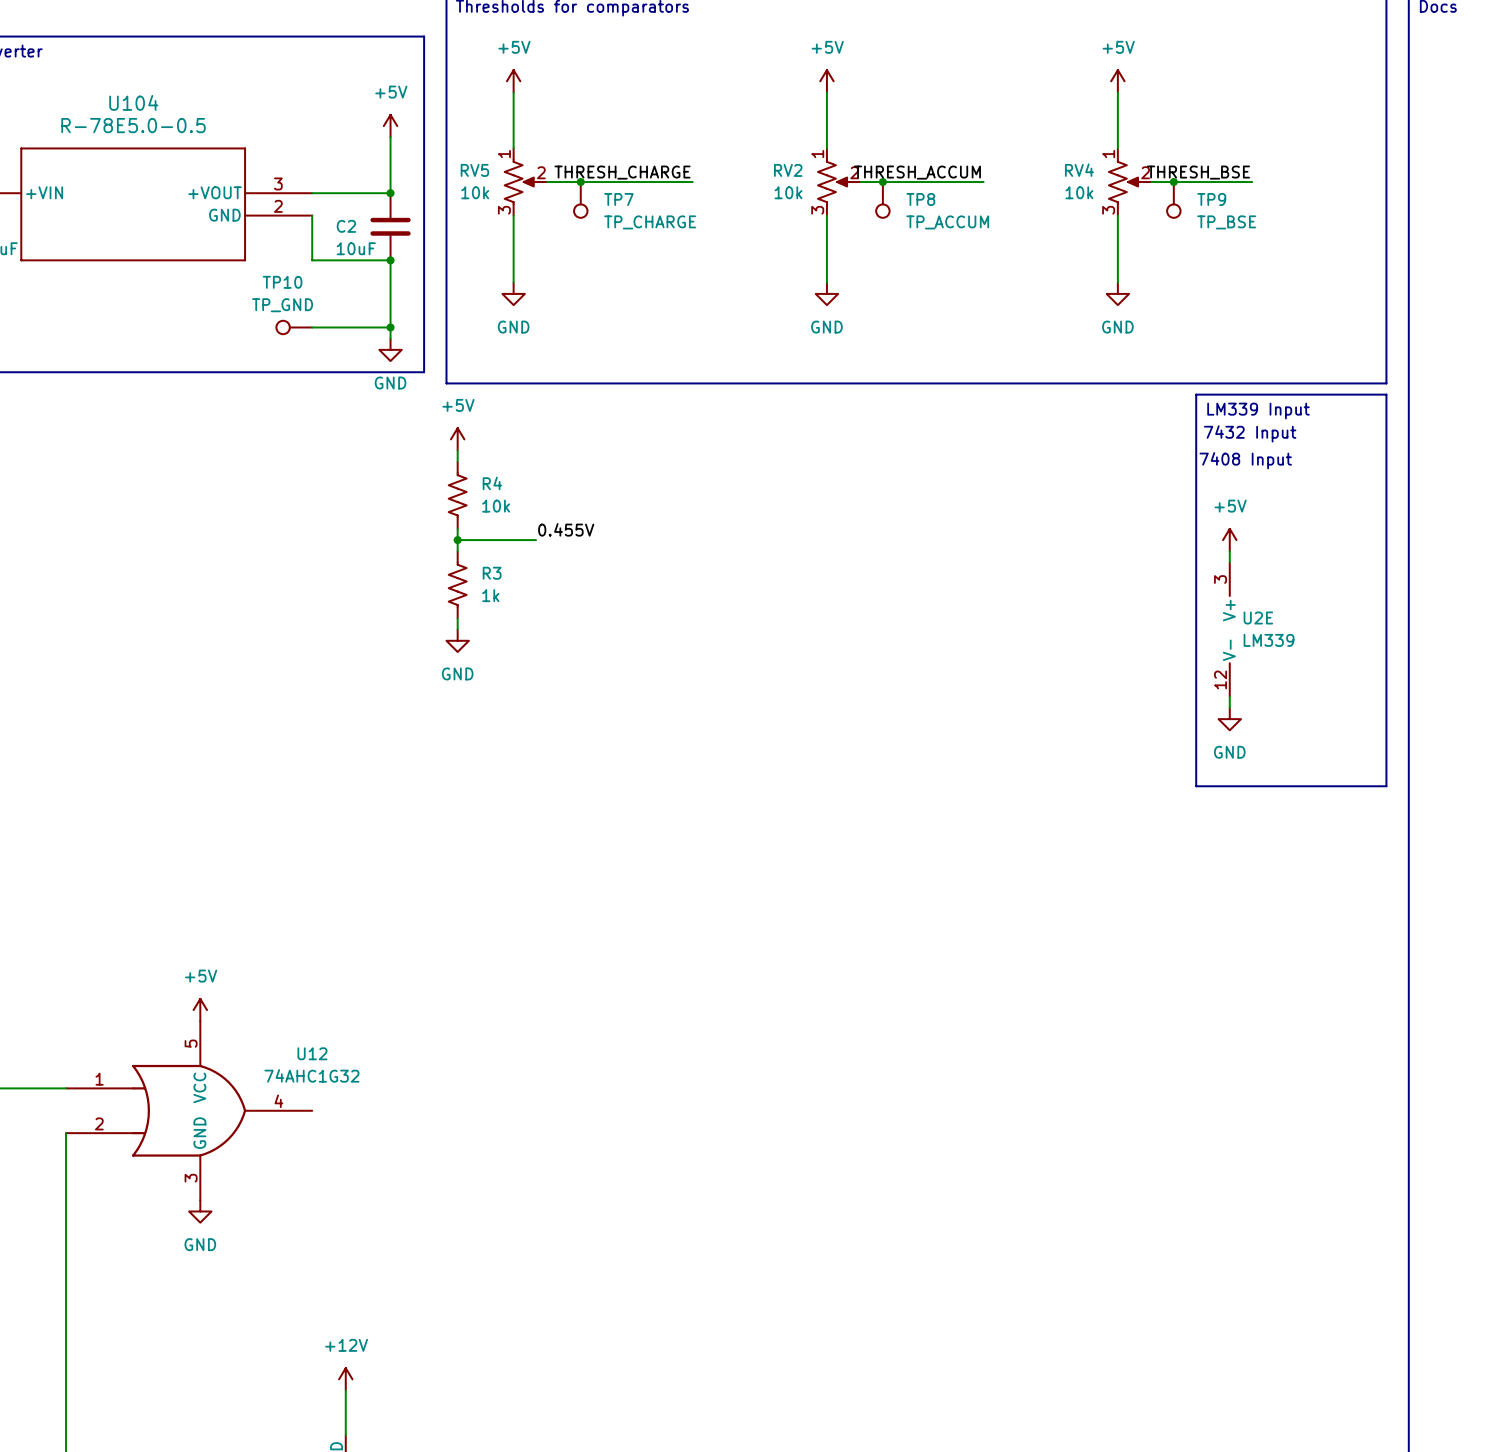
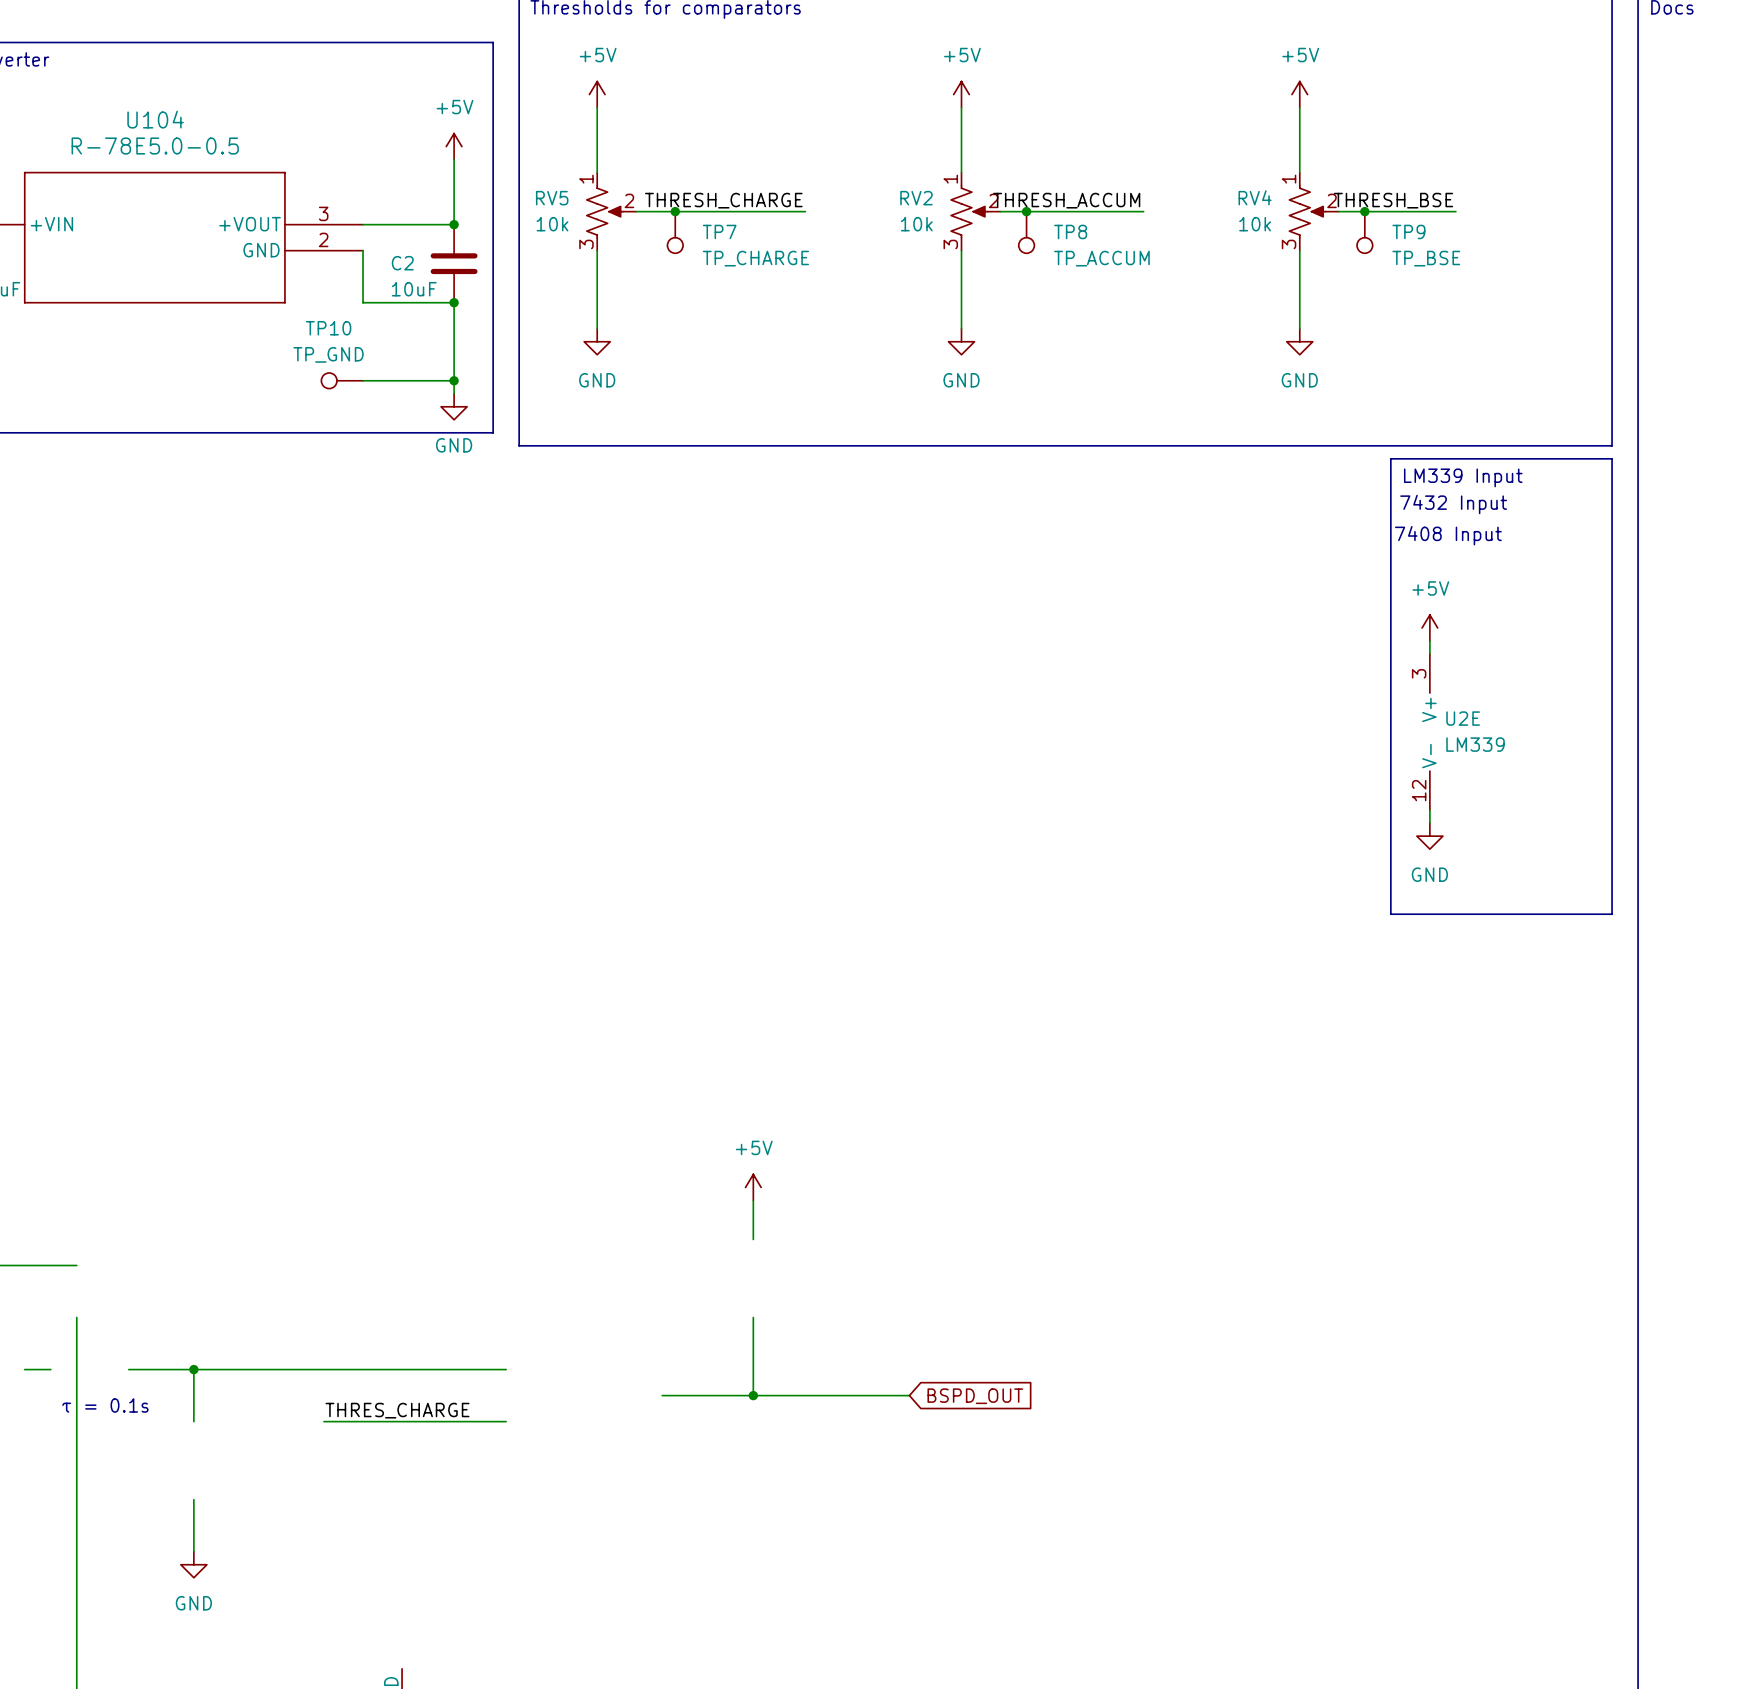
power symbol: +5V (457, 439) -> none
wire: (457, 450) (457, 461) -> none
R4: 10k (457, 495) -> none
wire: (457, 528) (457, 551) -> none
label: 0.455V (566, 529) -> none
wire: (457, 540) (536, 540) -> none
junction: (457, 540) -> none
R3: 1k (457, 584) -> none
wire: (457, 618) (457, 629) -> none
power symbol: GND (457, 640) -> none
power symbol: +5V (200, 1010) -> none
power symbol: none -> +5V (753, 1187)
wire: none -> (753, 1200) (753, 1239)
U12: 74AHC1G32 (189, 1110) -> none
wire: none -> (753, 1317) (753, 1395)
wire: none -> (24, 1369) (50, 1369)
wire: none -> (128, 1369) (506, 1369)
wire: none -> (193, 1369) (193, 1421)
junction: none -> (193, 1369)
wire: none -> (662, 1395) (909, 1395)
junction: none -> (753, 1395)
global label: none -> BSPD_OUT (975, 1396)
text: none -> τ = 0.1s (105, 1405)
power symbol position: GND (200, 1211) -> GND (193, 1564)
label: none -> THRES_CHARGE (397, 1410)
wire: none -> (323, 1421) (506, 1421)
power symbol: +12V (345, 1379) -> none
wire: (345, 1390) (345, 1435) -> (193, 1499) (193, 1551)

